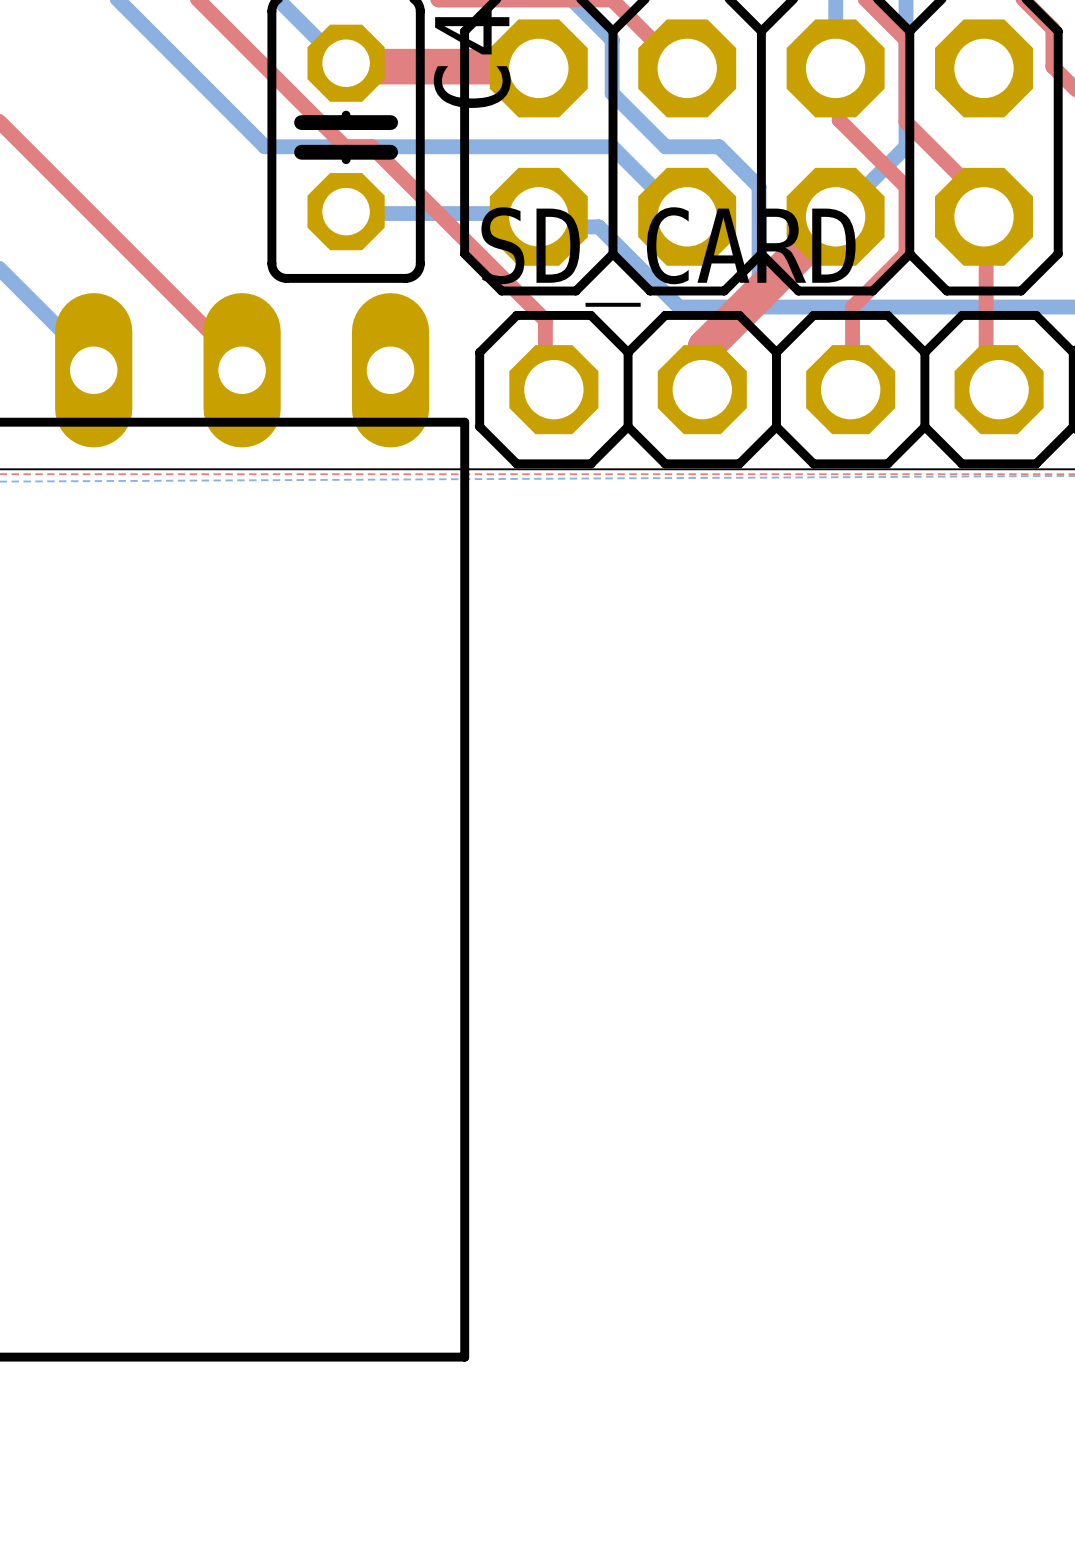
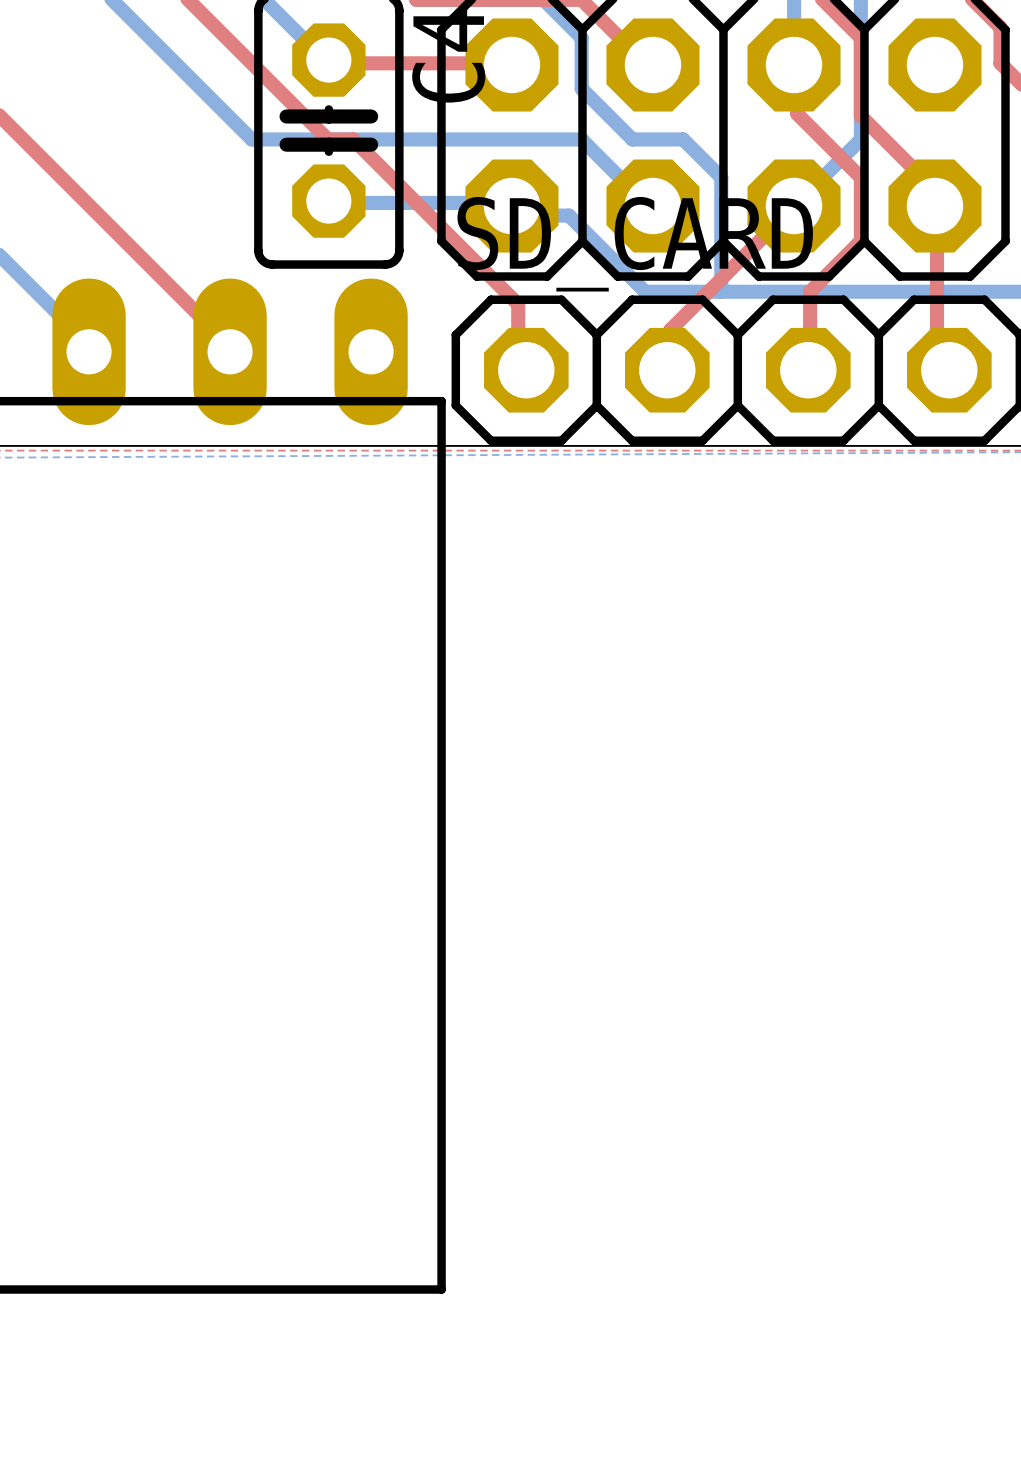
top track width: thick (358, 66) (532, 66) -> thin (340, 63) (505, 63)
top track width: thick (825, 226) (705, 347) (705, 387) -> thin (784, 215) (670, 329) (670, 367)

